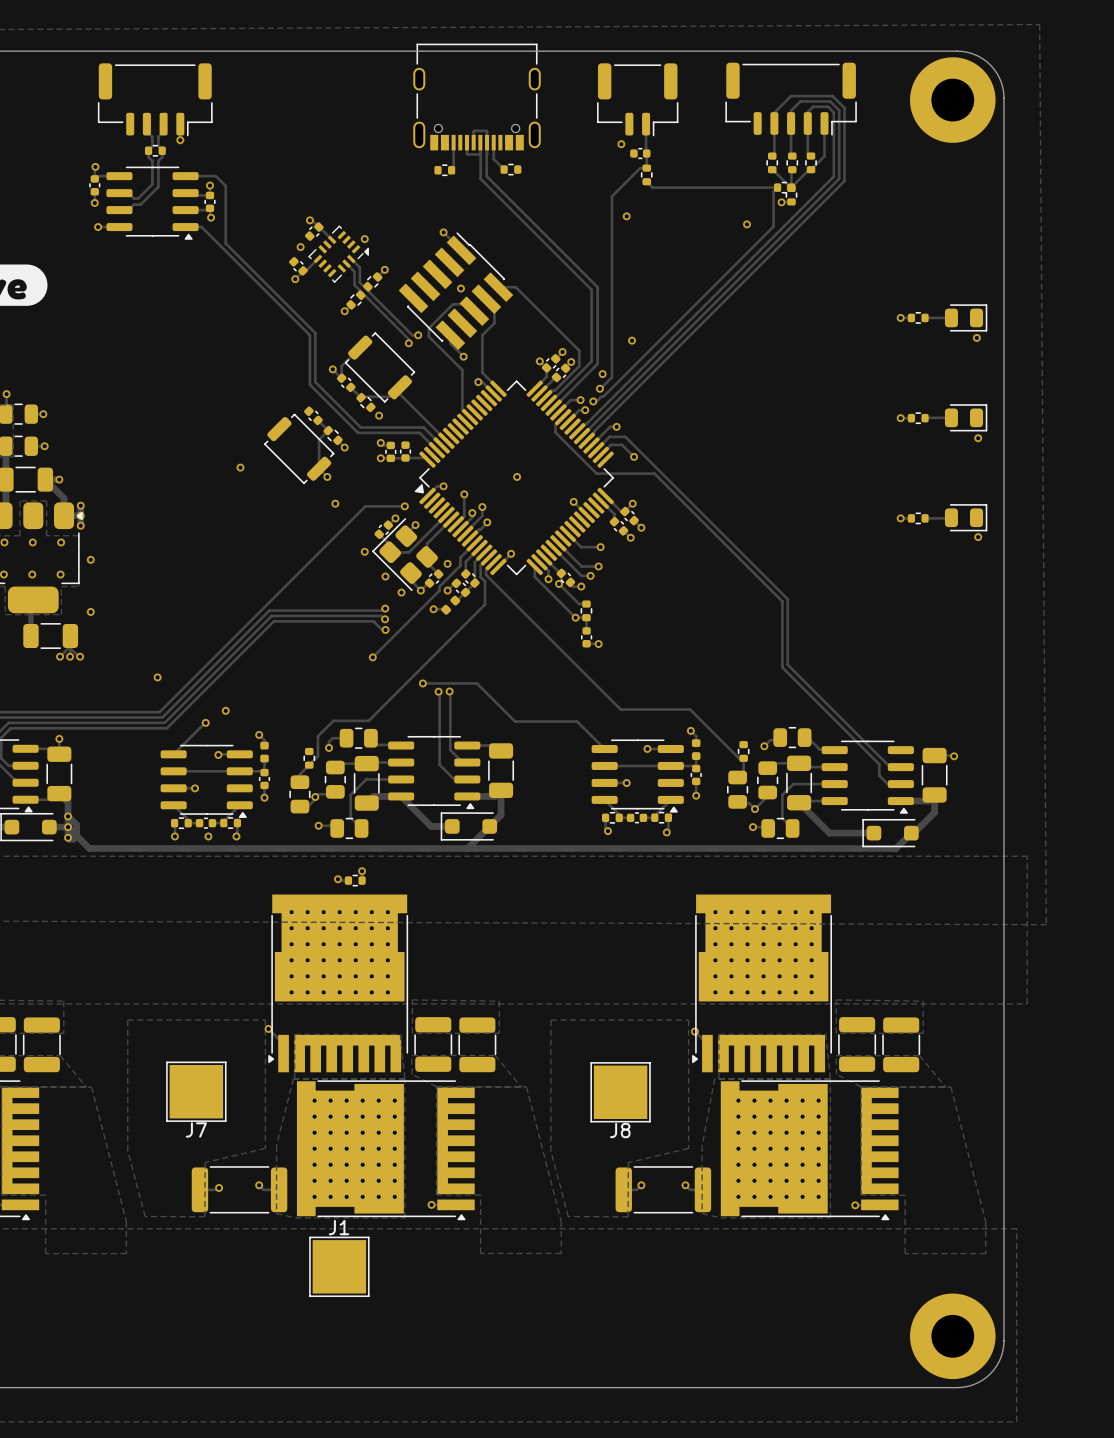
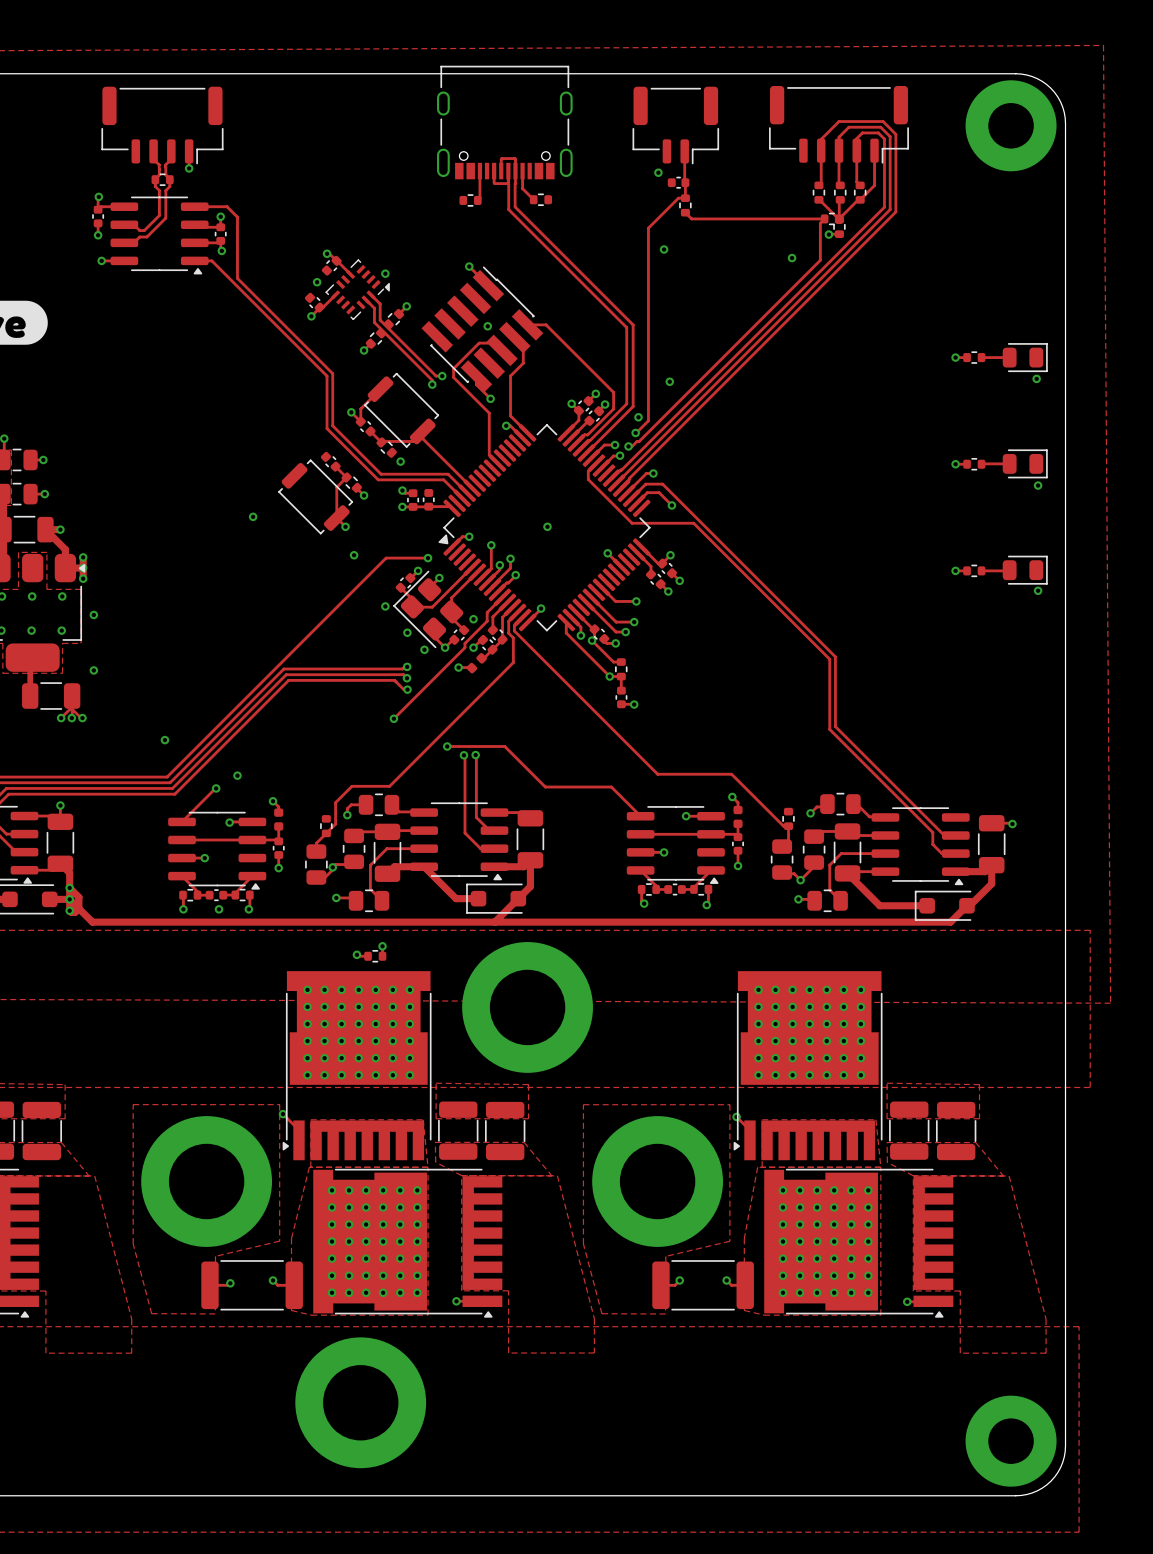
part: none -> (527, 1007)
J7: (196, 1091) -> none
part: none -> (206, 1181)
J8: (620, 1092) -> none
part: none -> (657, 1181)
J1: (339, 1266) -> none
part: none -> (360, 1402)

